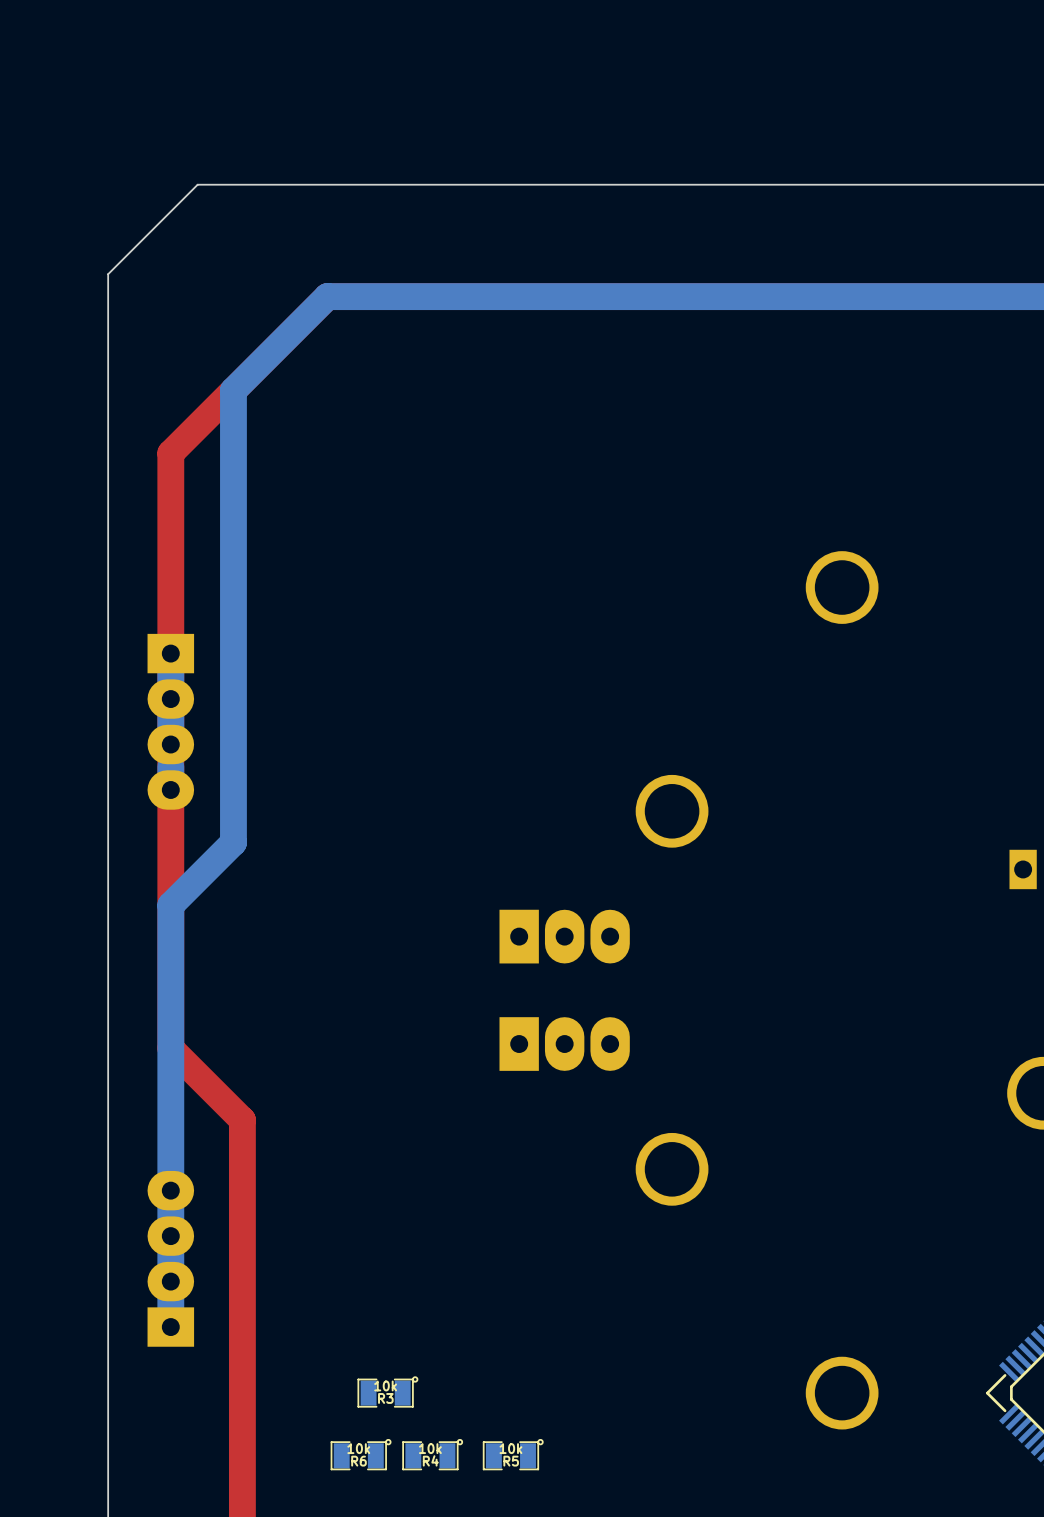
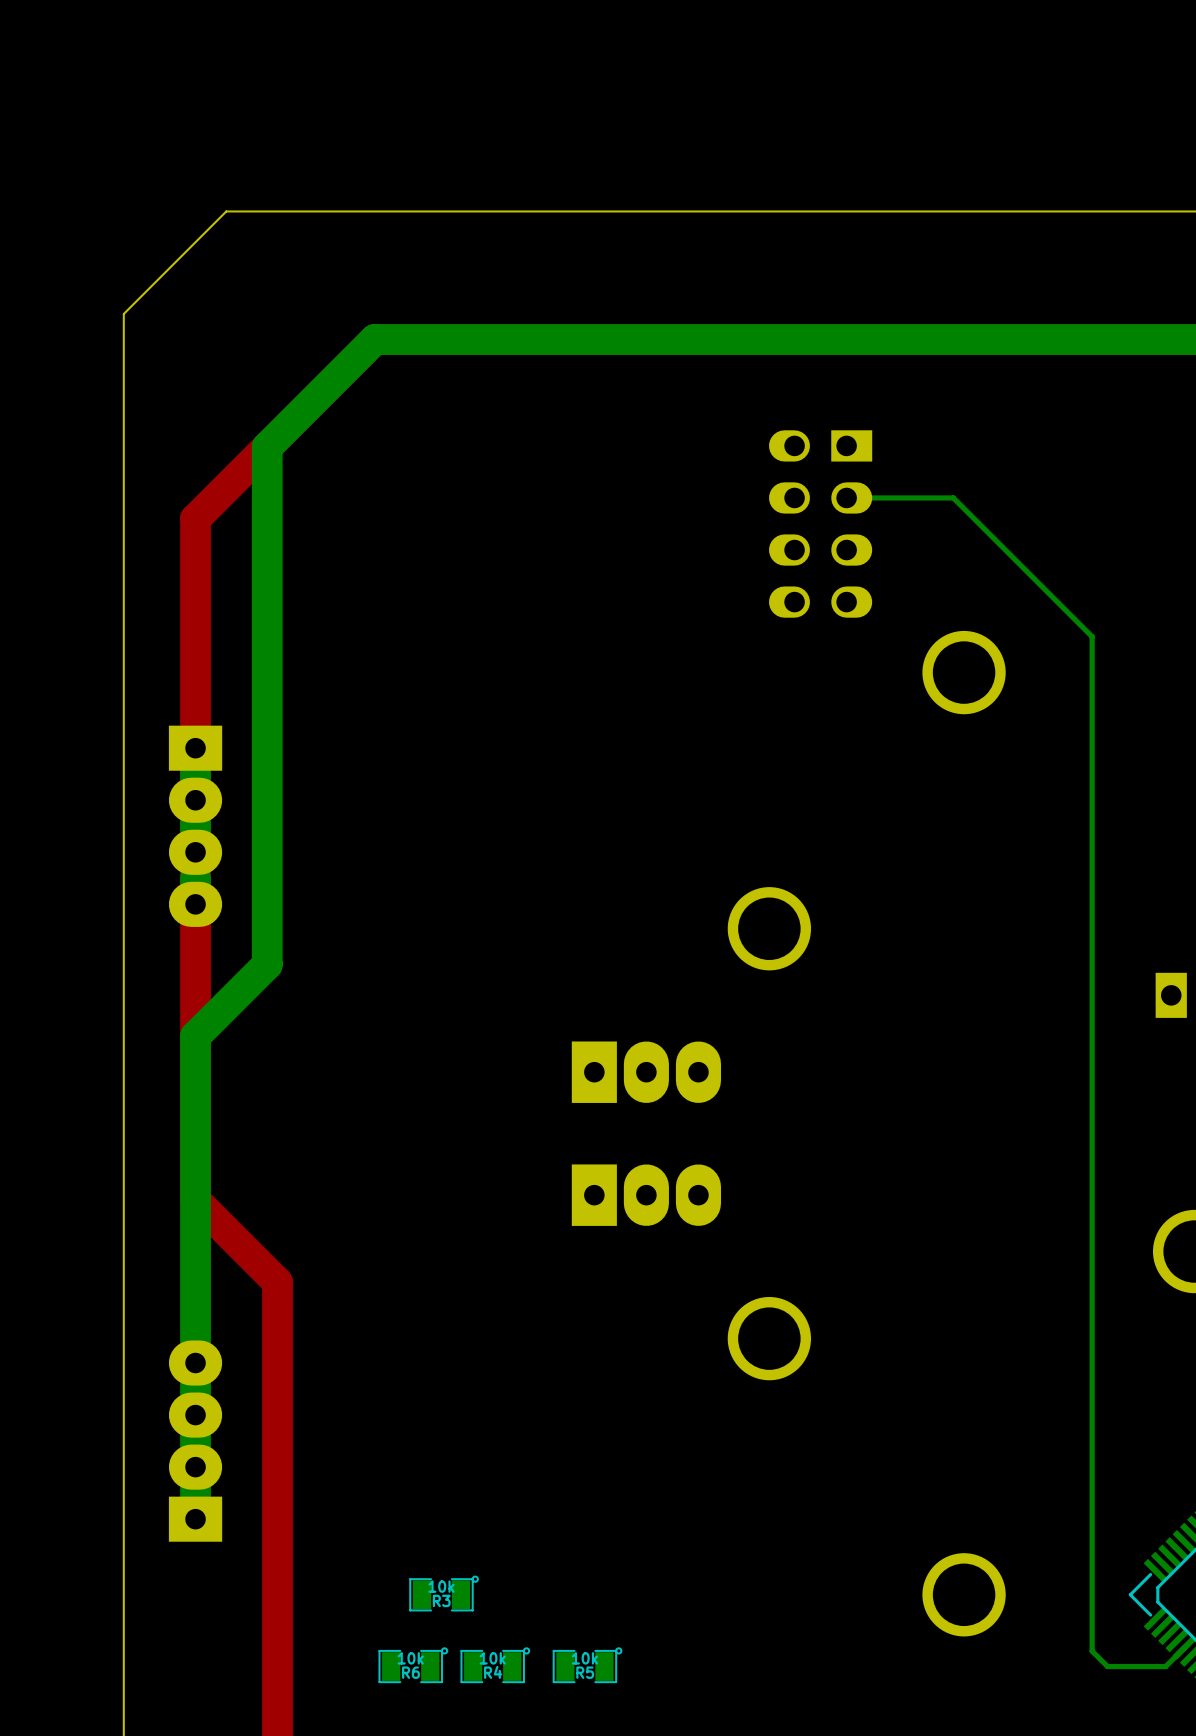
bottom track: none -> (846, 497) (953, 497) (1092, 636) (1092, 1651) (1107, 1666) (1165, 1666) (1184, 1648)
part: none -> (820, 523)

